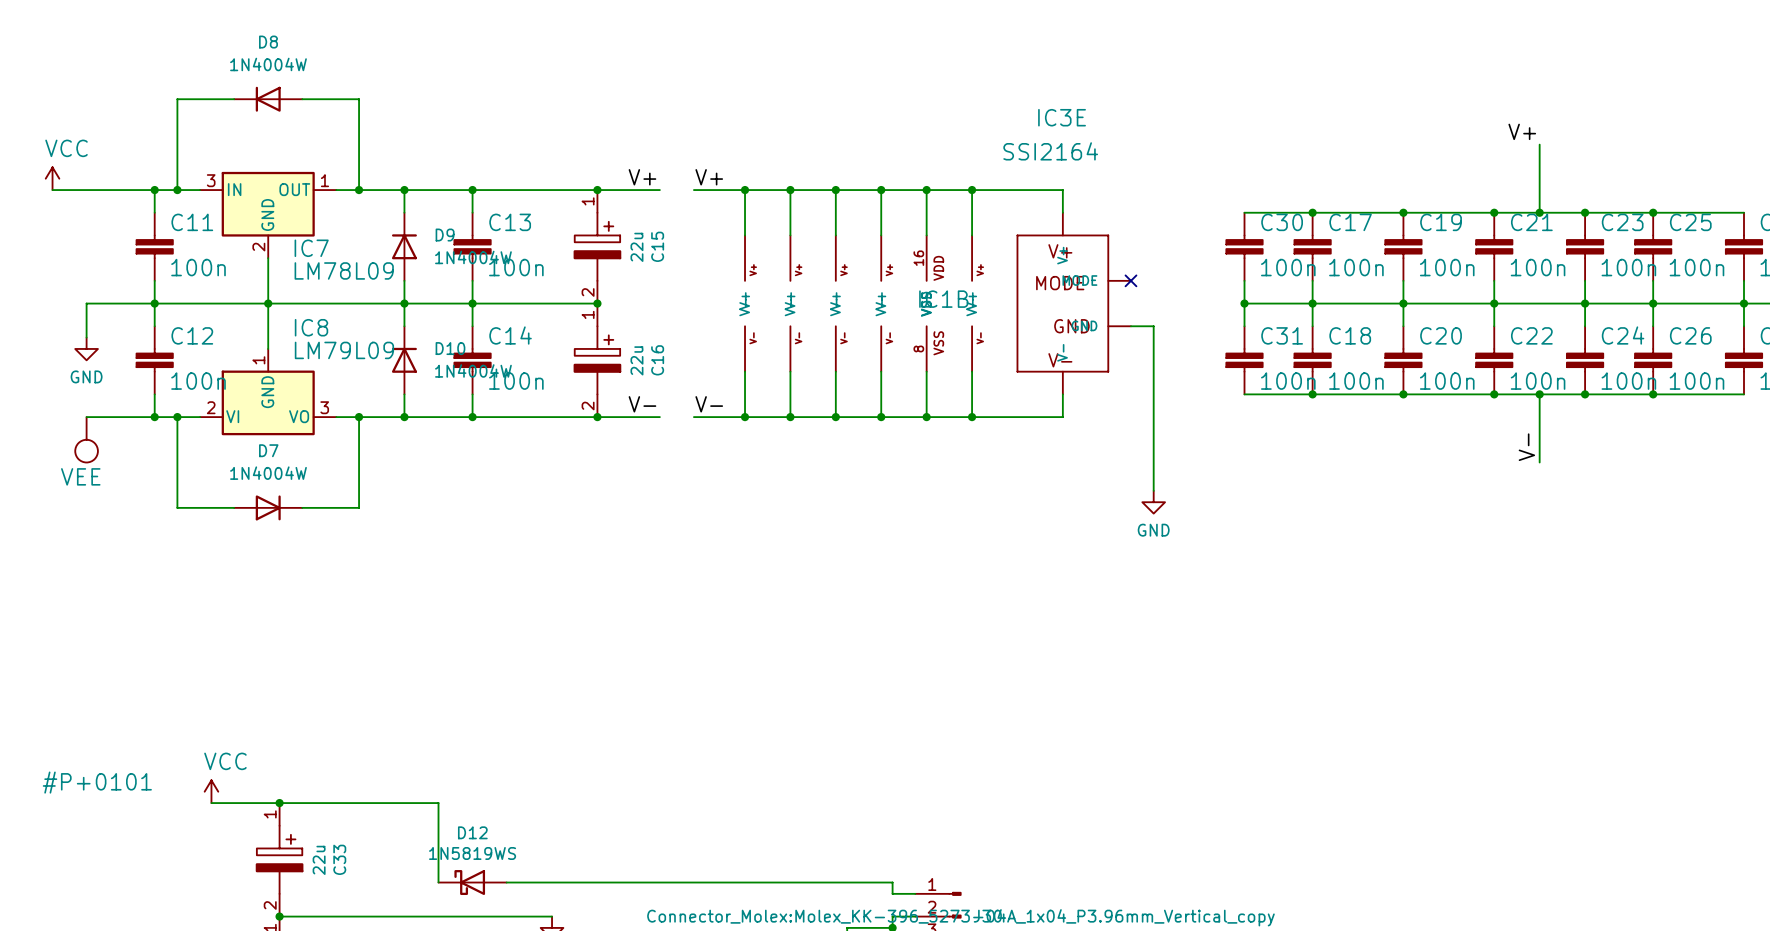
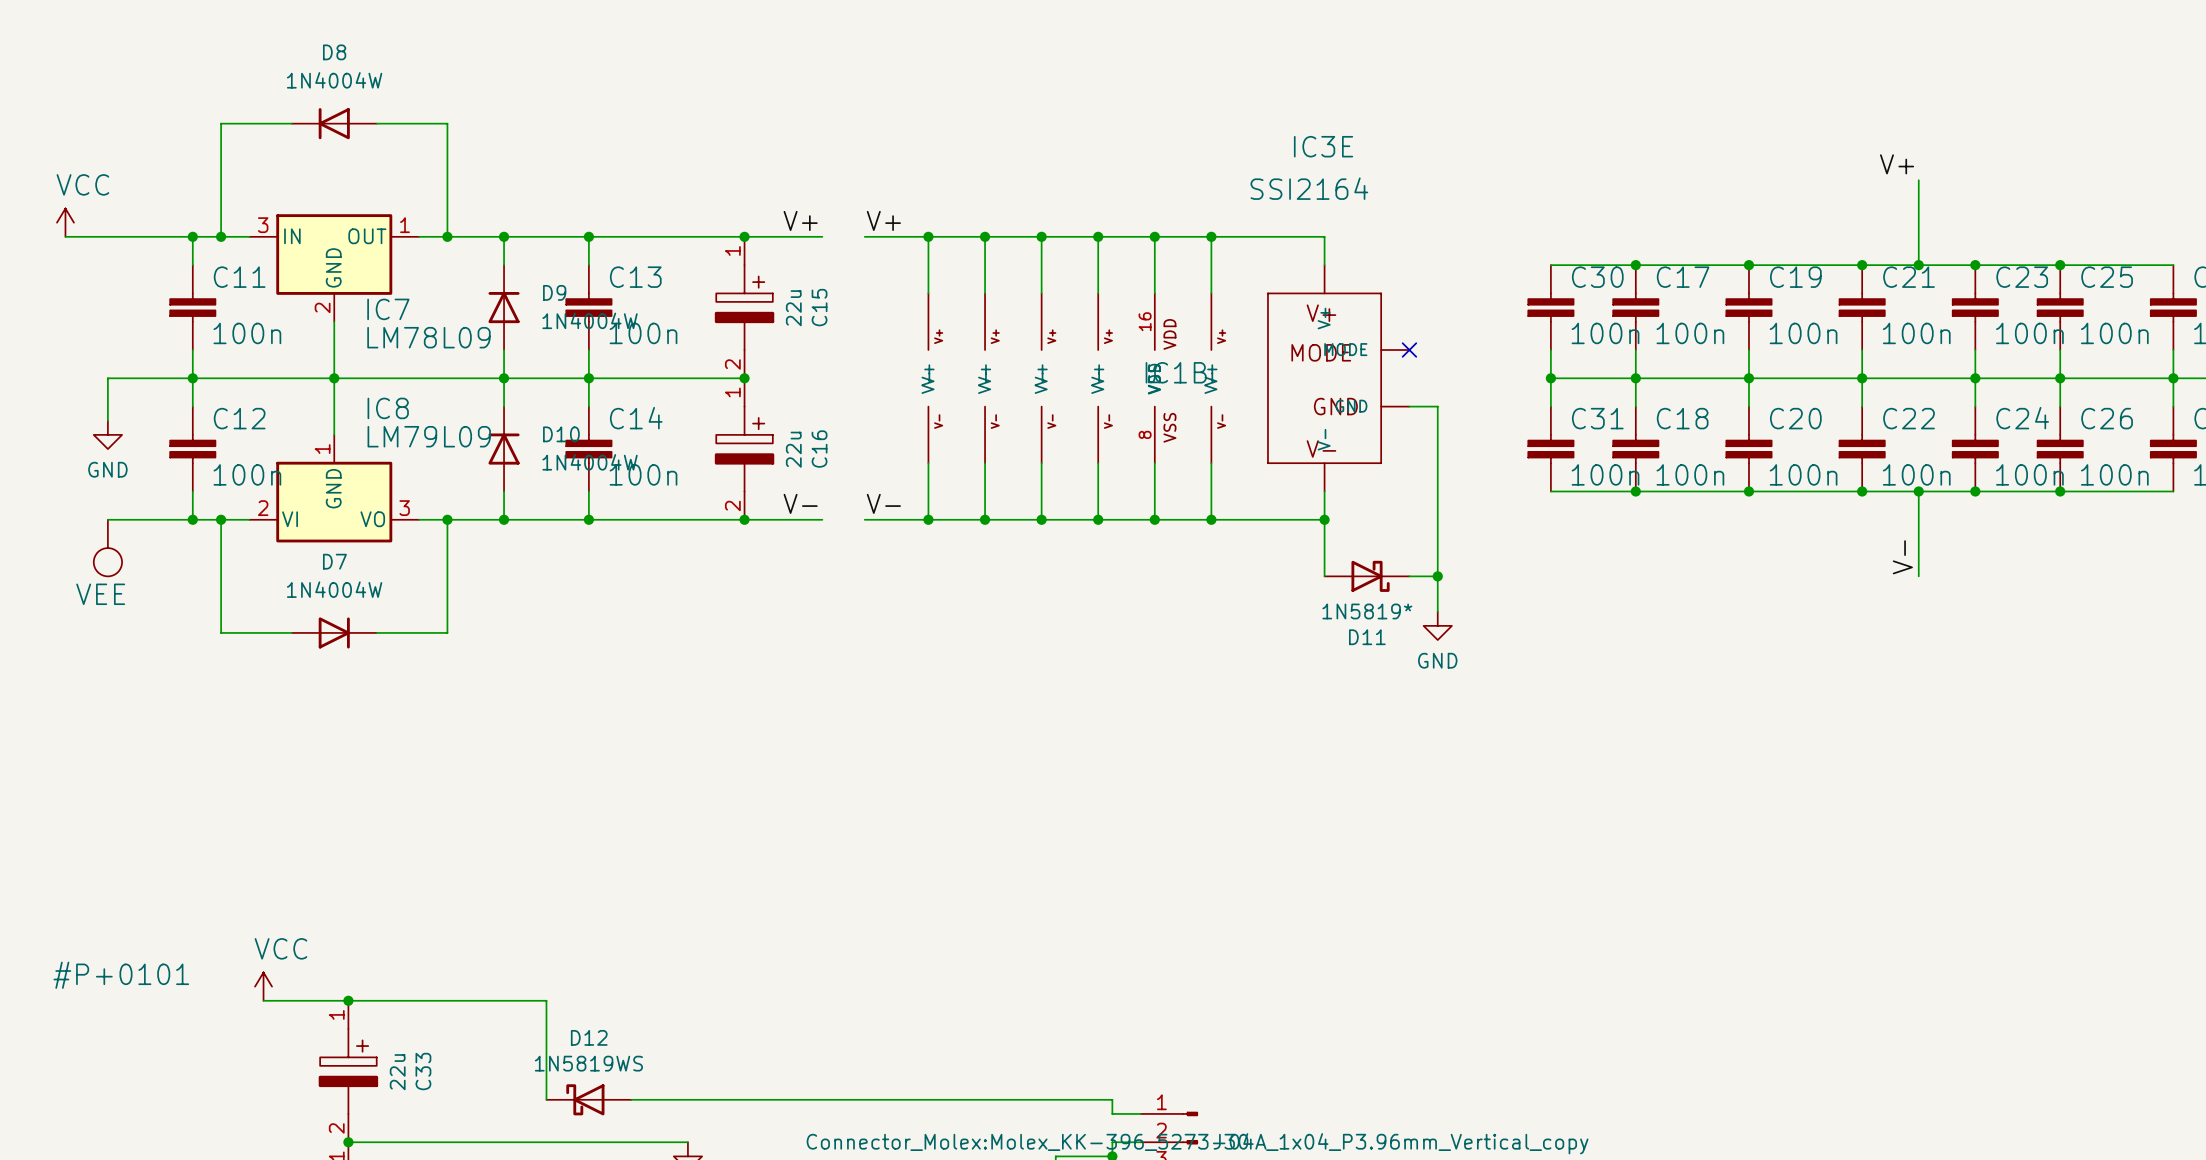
wire: none -> (1324, 519) (1324, 576)
junction: none -> (1324, 519)
D11: none -> 1N5819* (1367, 576)
wire: none -> (1409, 576) (1437, 576)
junction: none -> (1437, 576)

